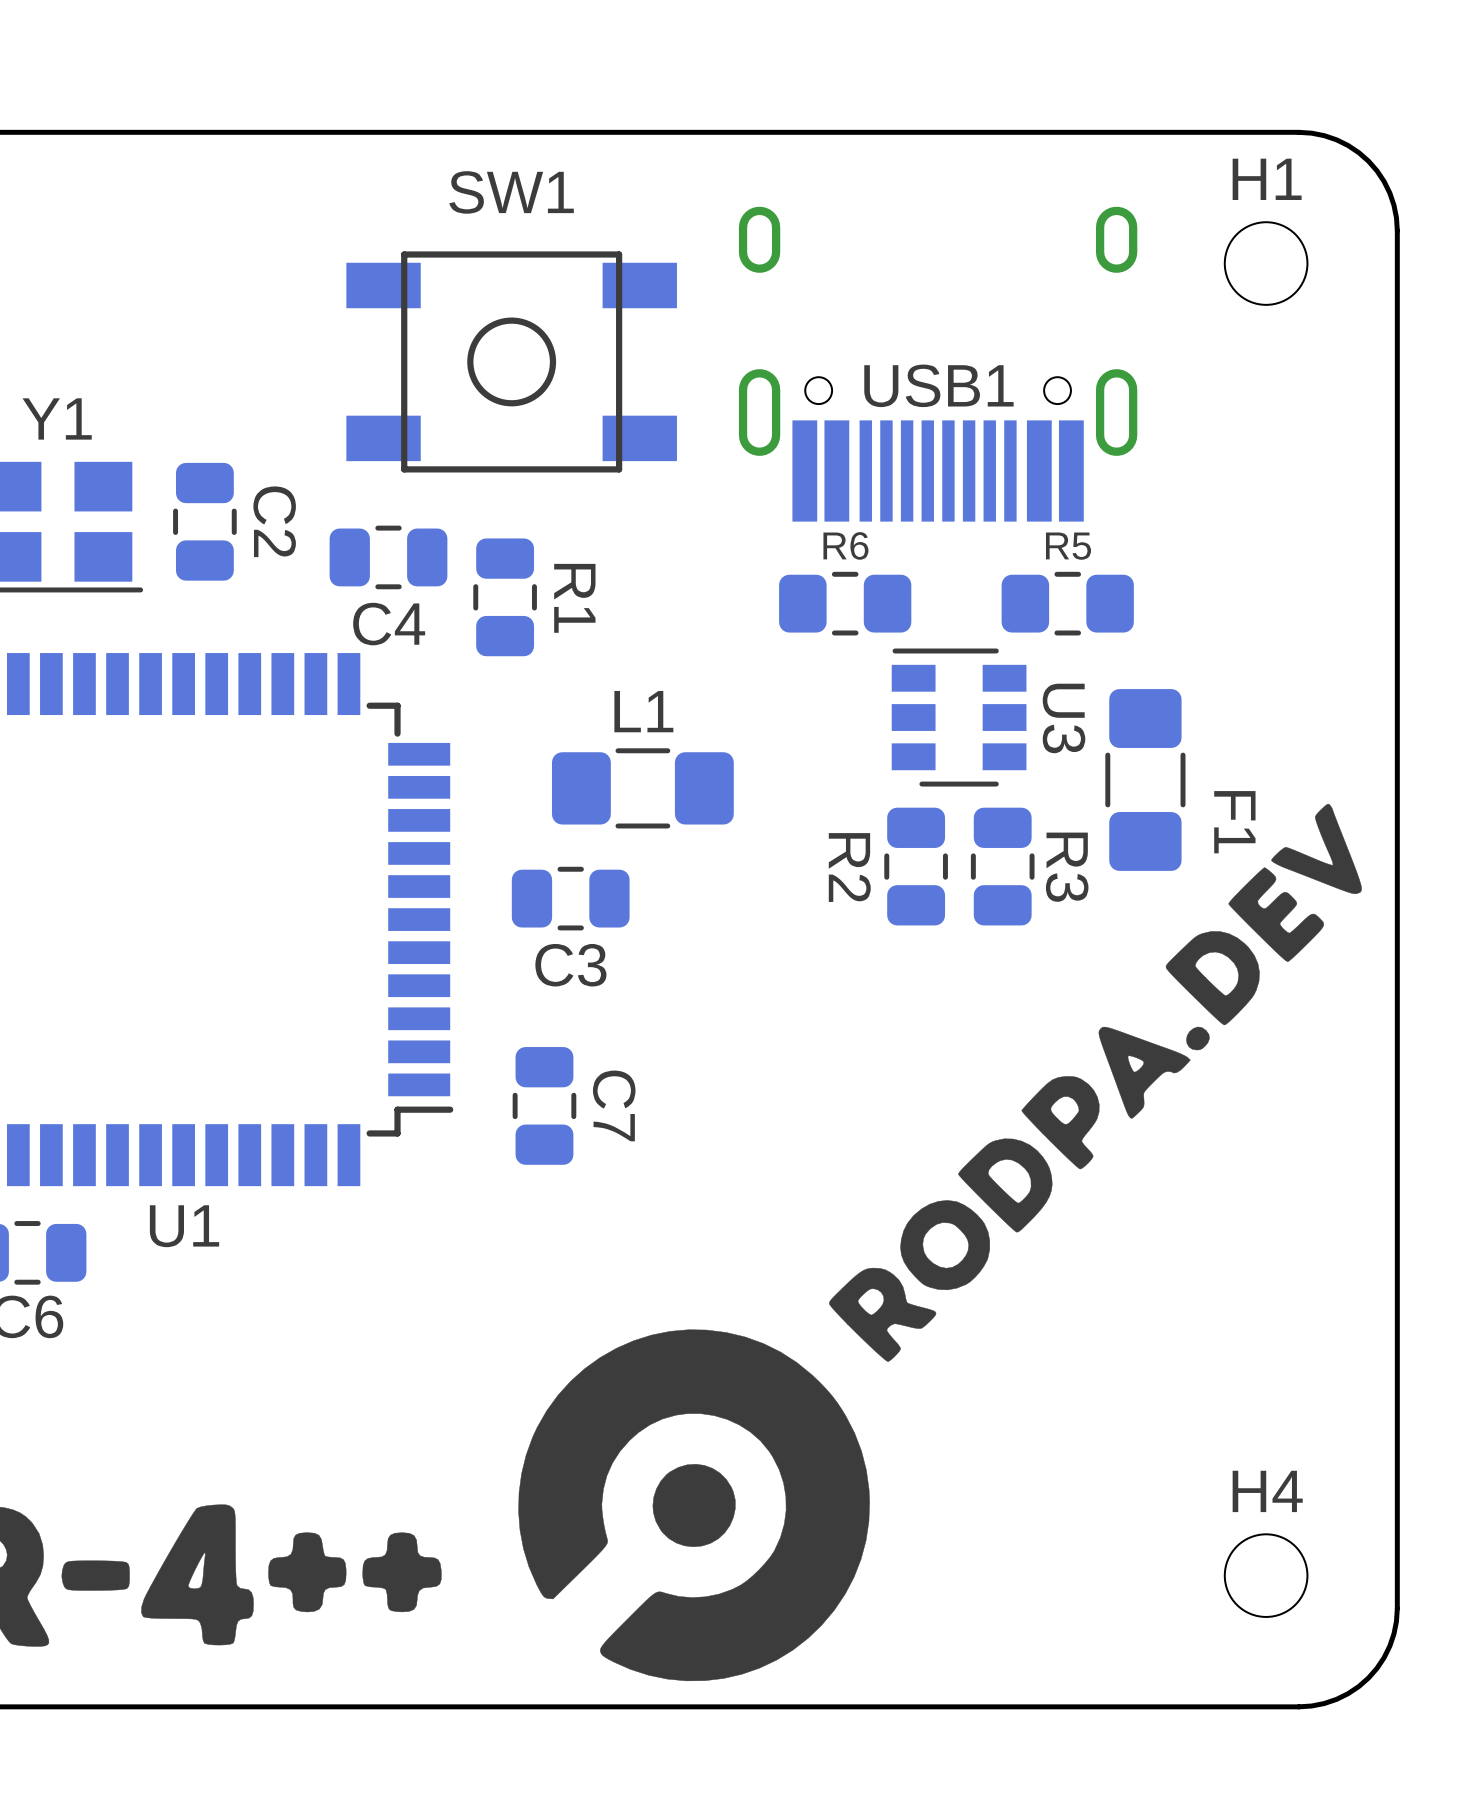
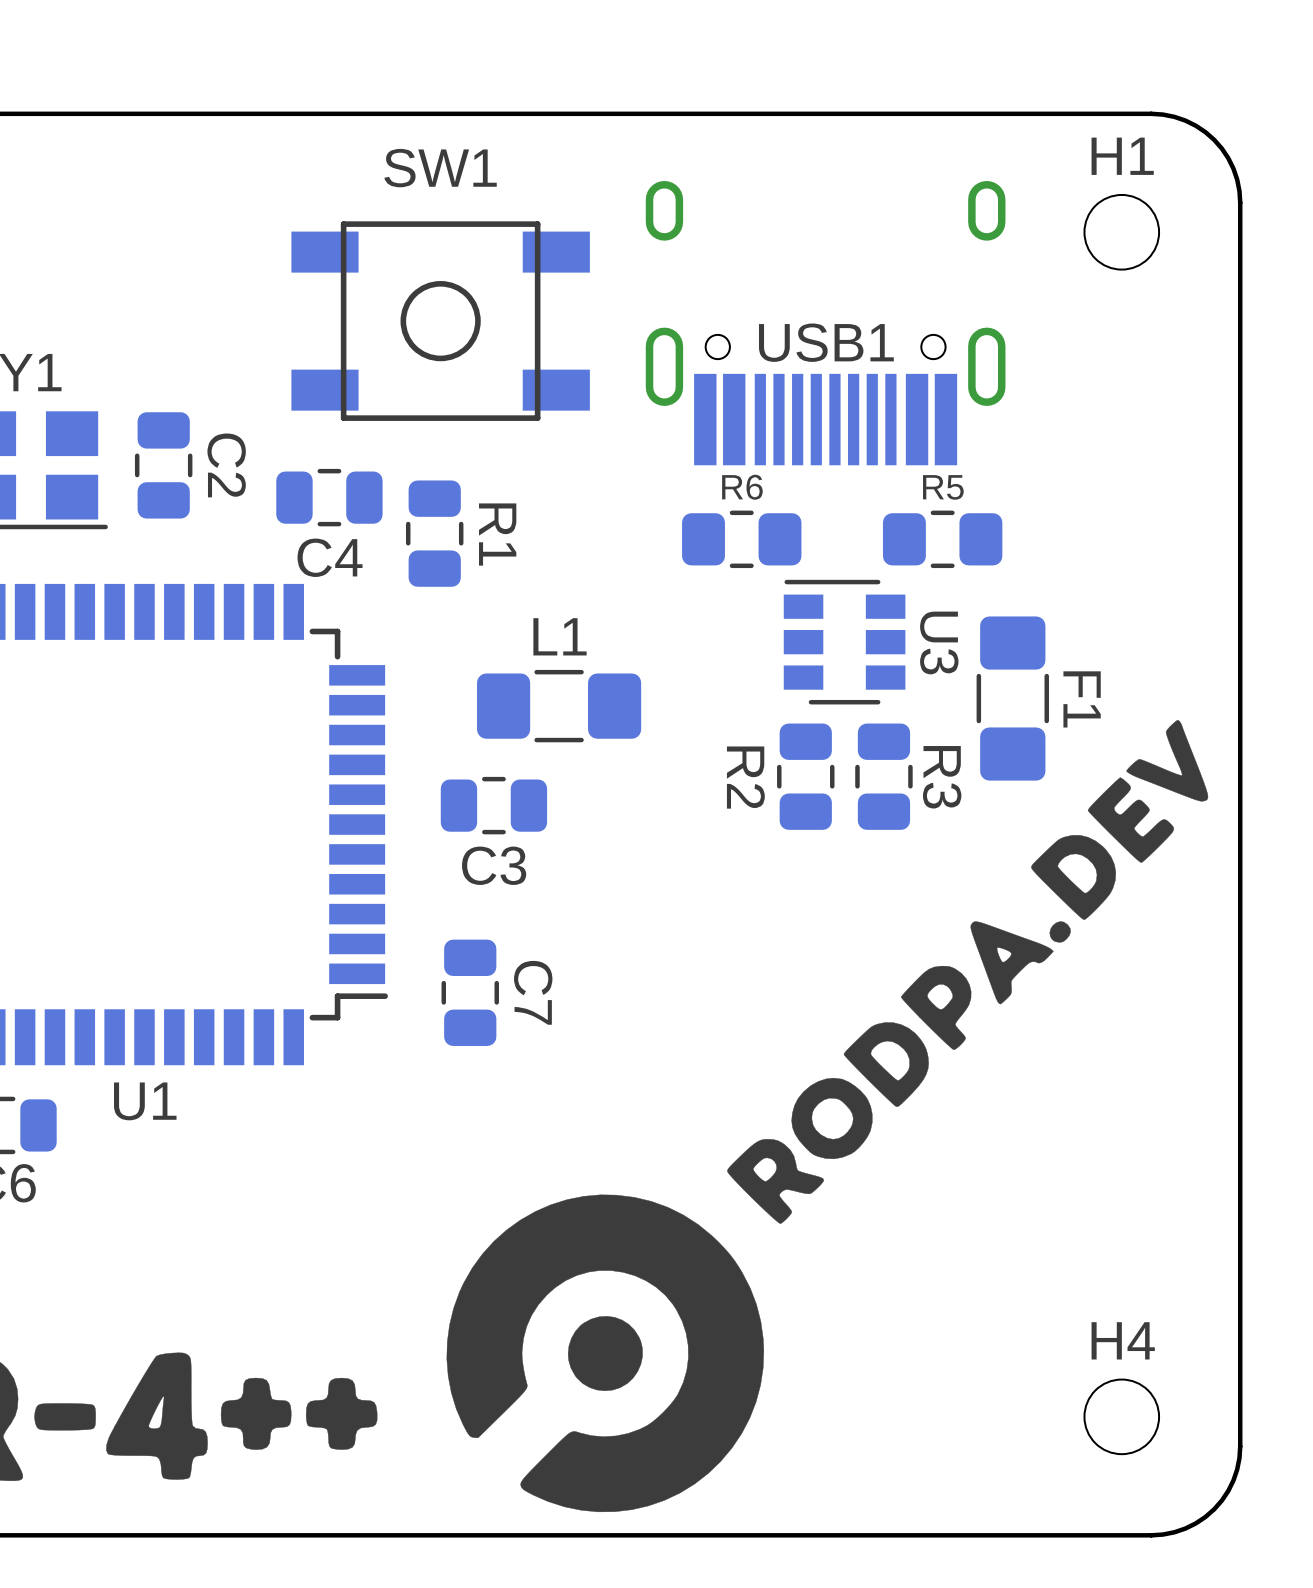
F1 name position: F1 (1234, 822) -> F1 (1082, 699)

